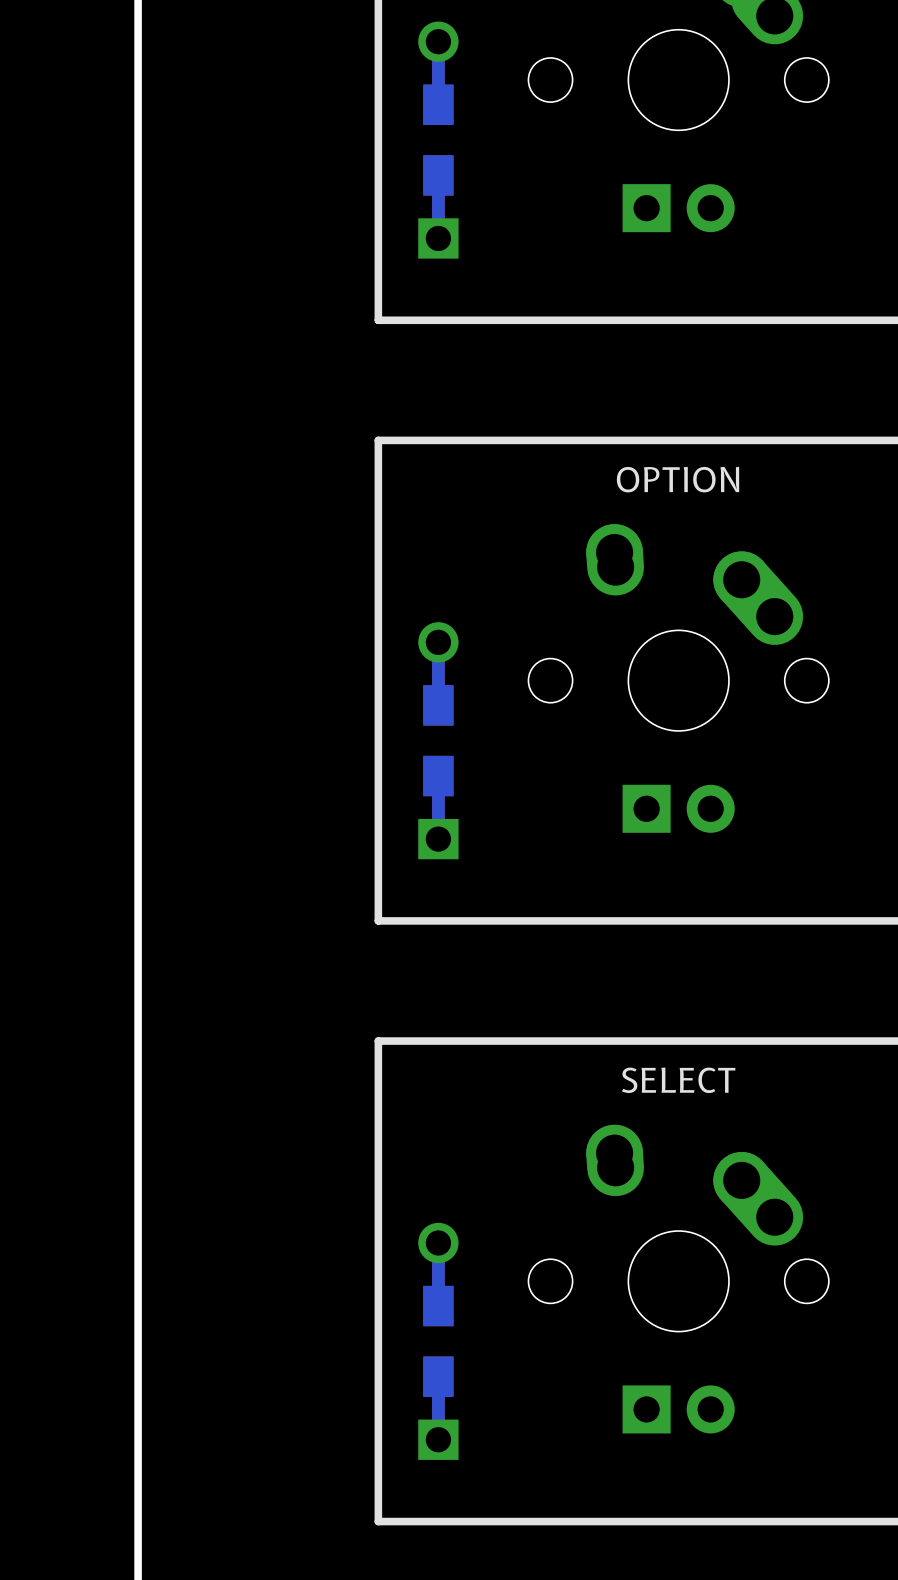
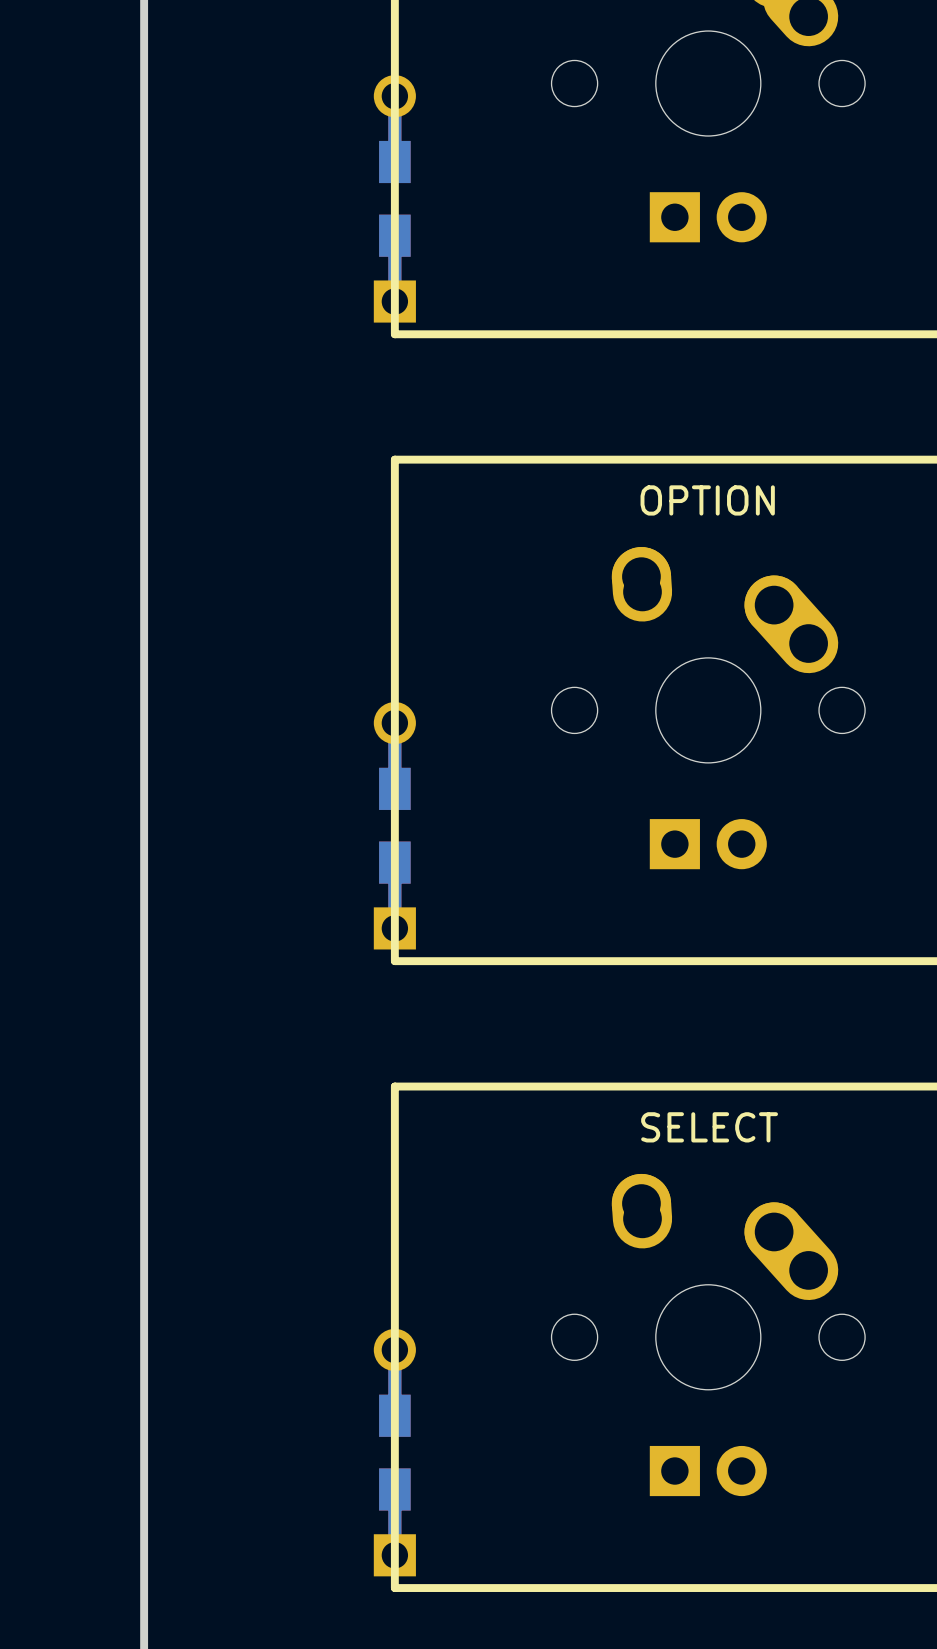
part position: (438, 140) -> (394, 198)
part position: (438, 740) -> (394, 825)
part position: (438, 1341) -> (394, 1452)

